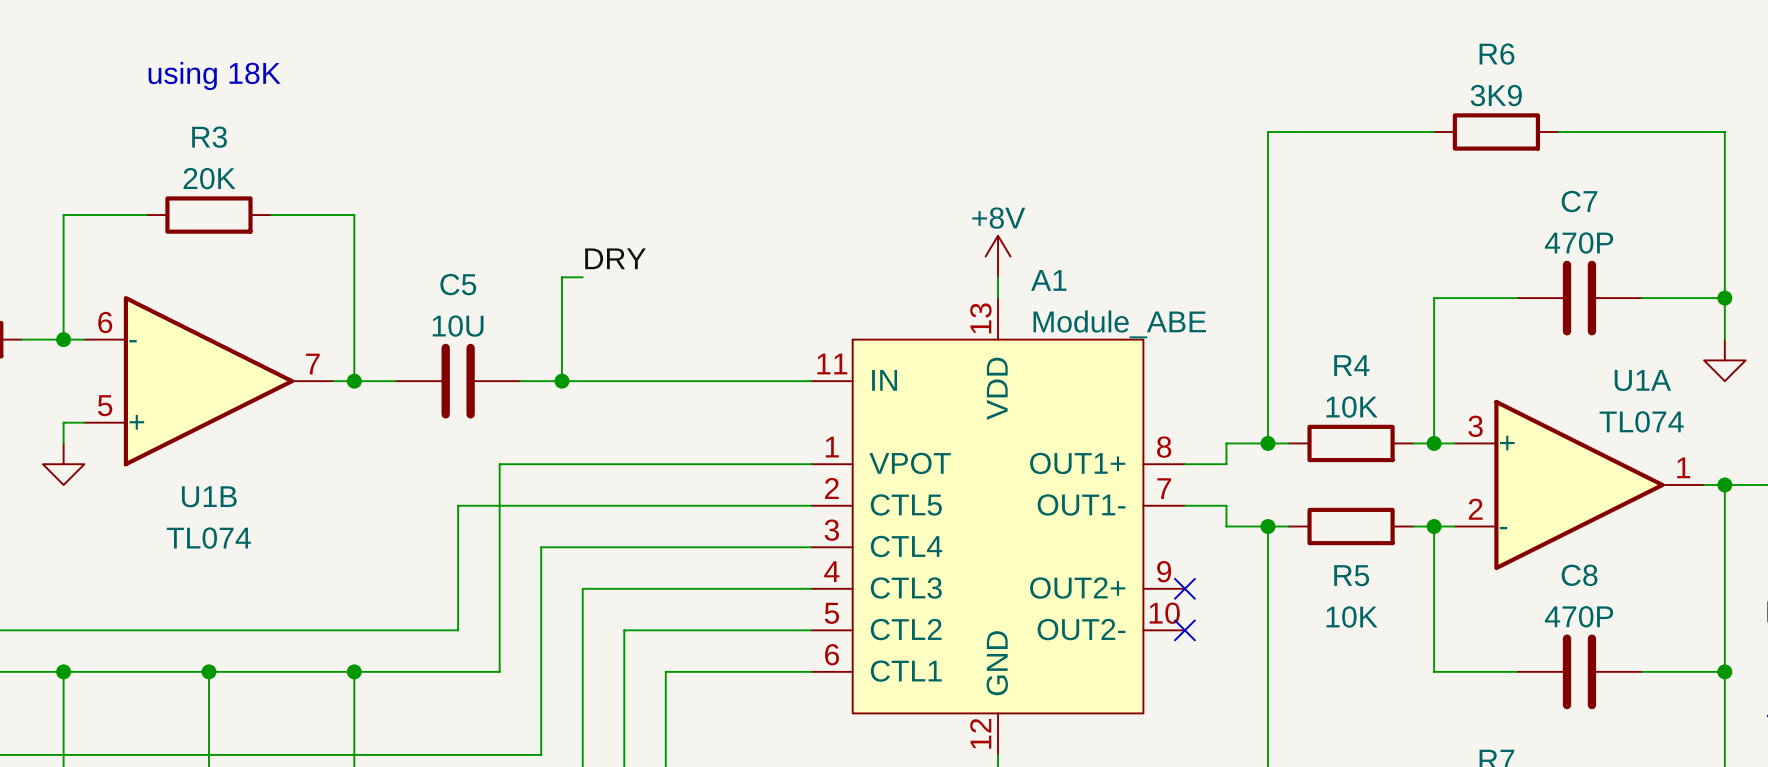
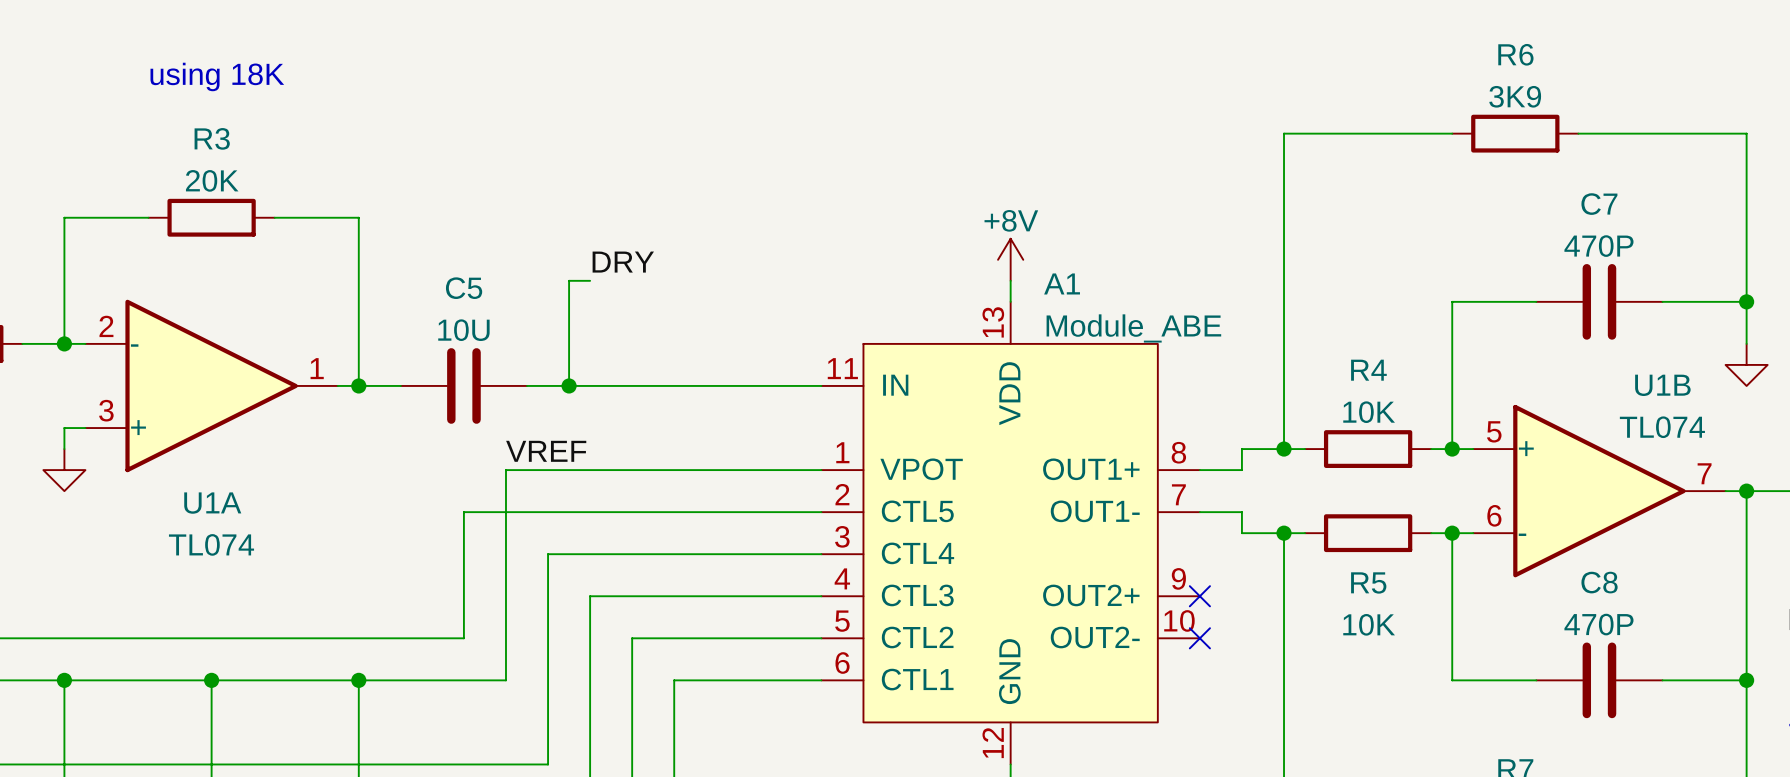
U1A name position: U1A (1642, 380) -> U1A (212, 503)
U1B flip: as is (208, 381) -> up-down (1599, 491)
U1B position: (208, 381) -> (1599, 491)
label: none -> VREF (546, 451)
U1A flip: as is (1579, 484) -> up-down (211, 385)
U1A position: (1579, 484) -> (211, 385)
U1B name position: U1B (209, 496) -> U1B (1662, 385)

